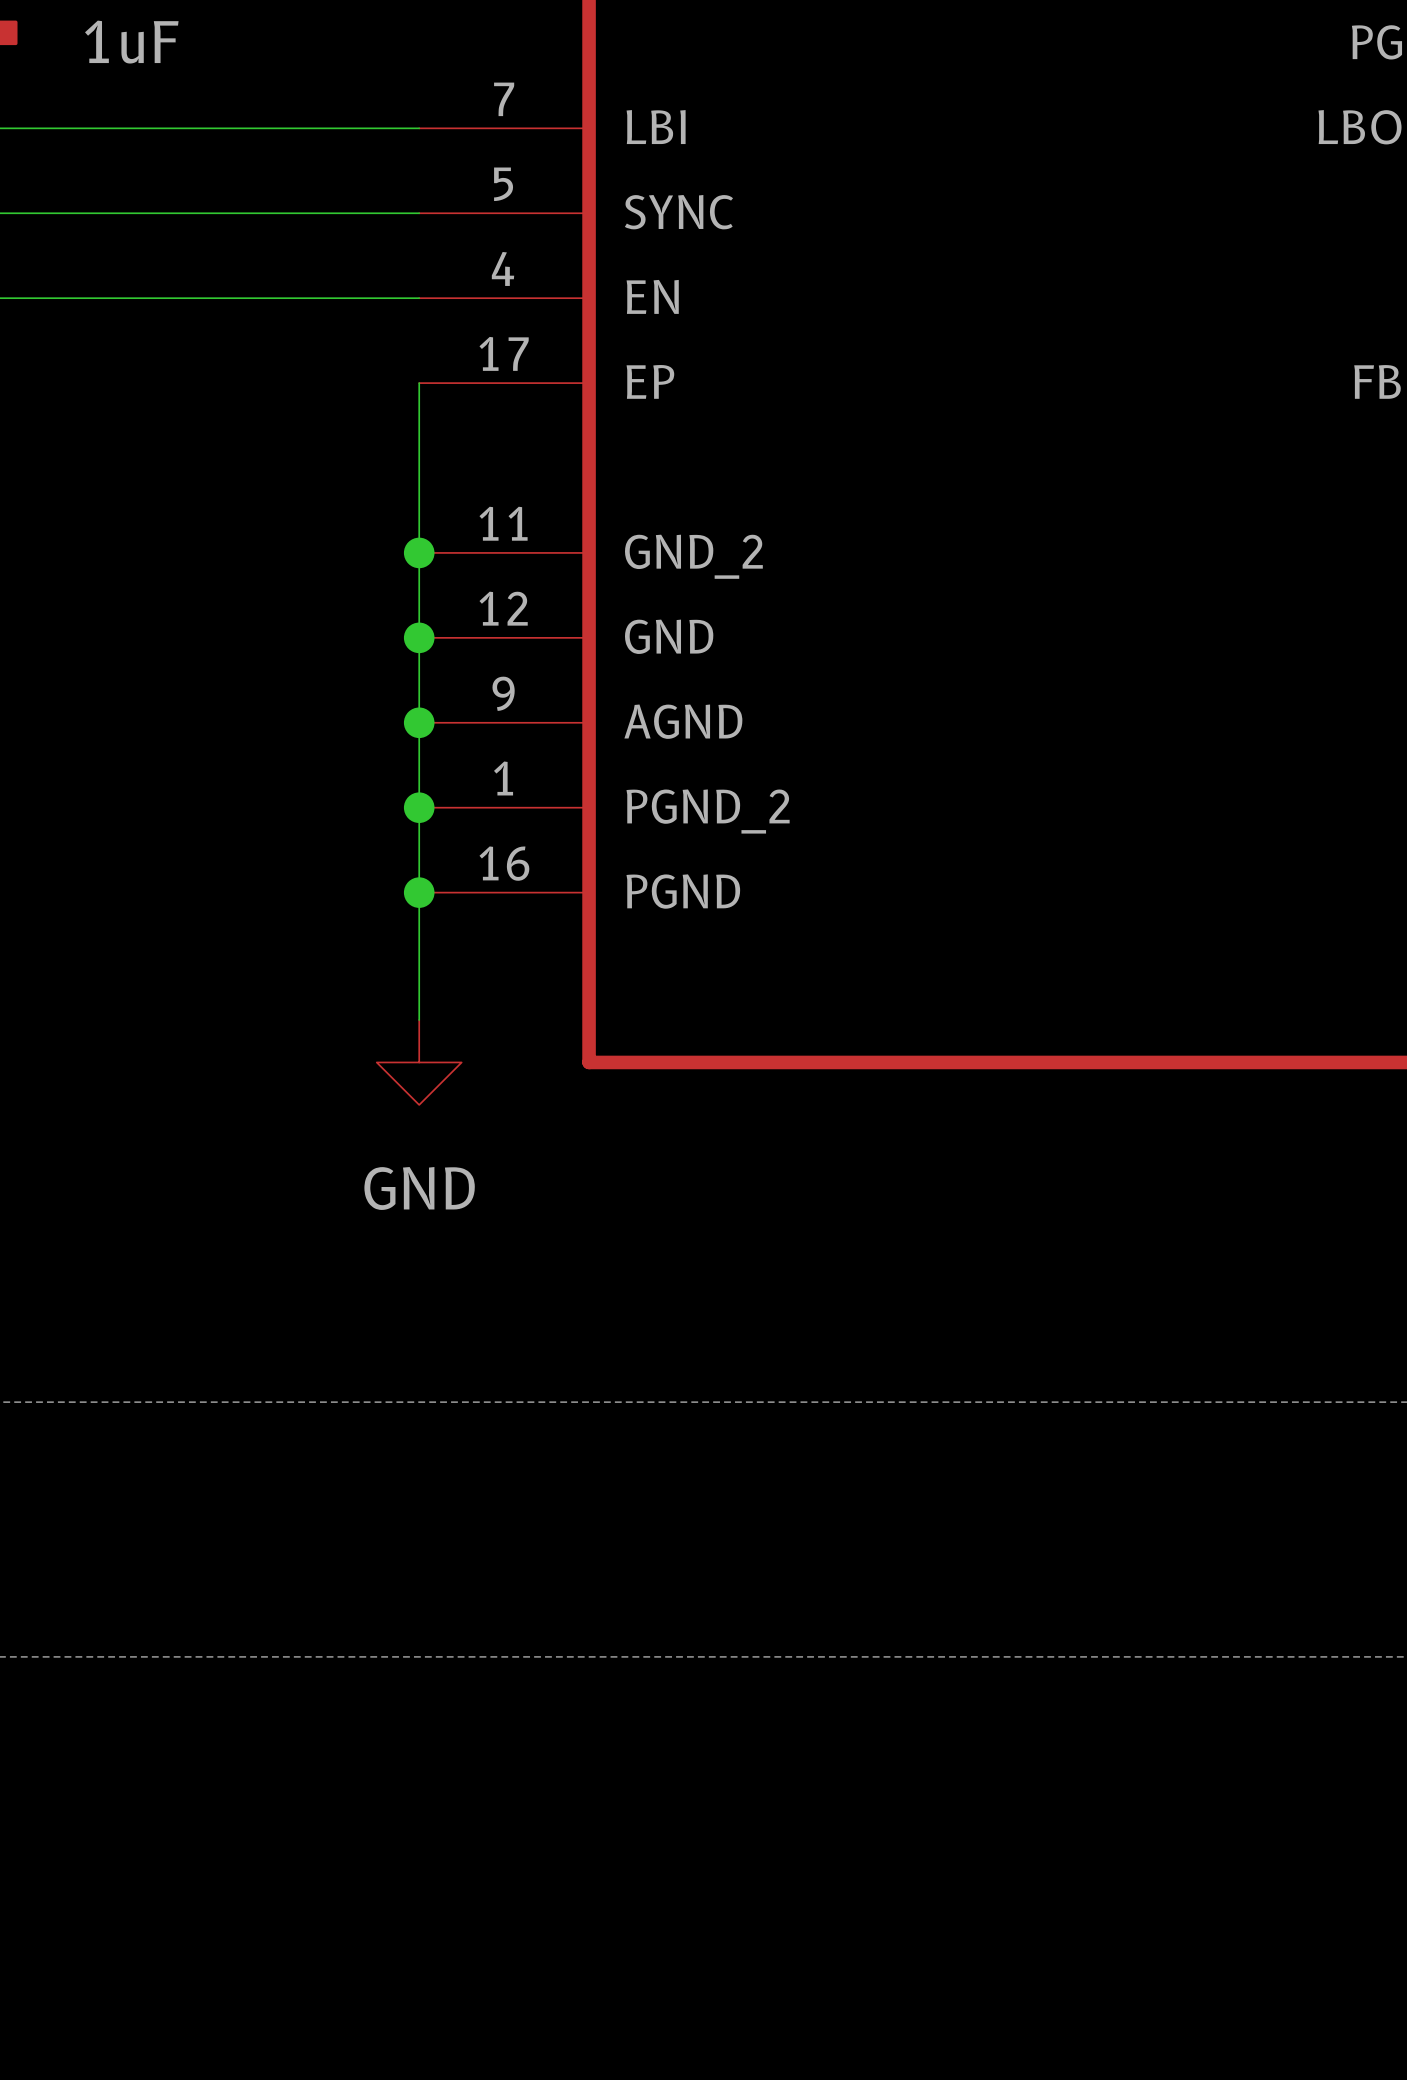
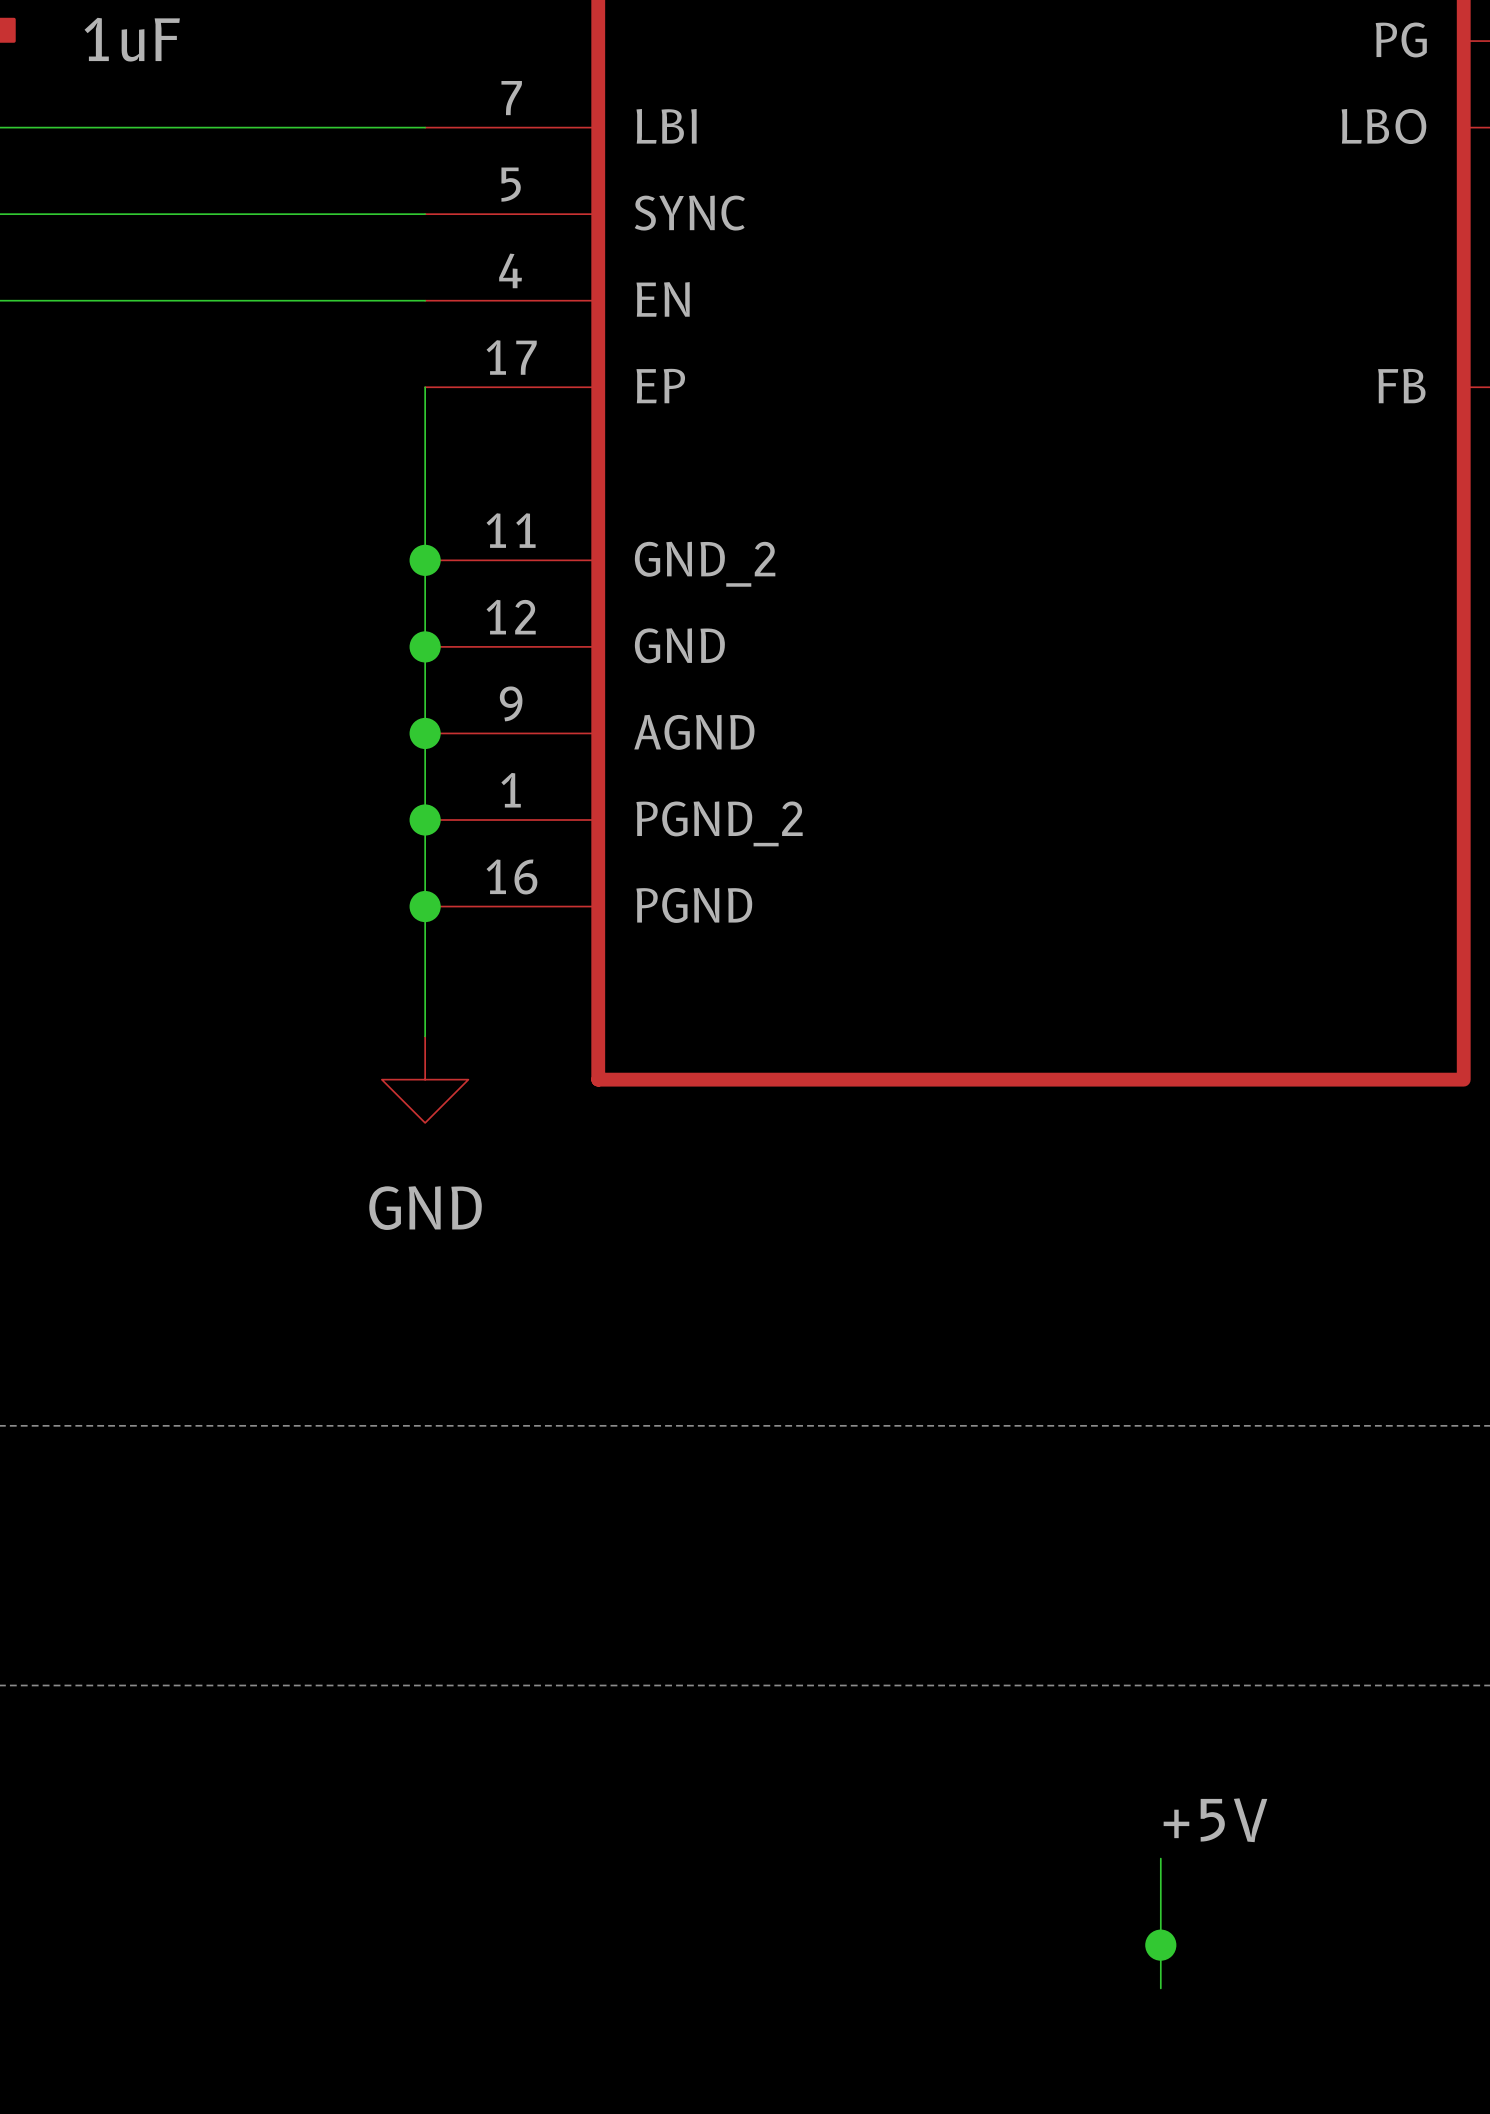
label: none -> +5V (1215, 1820)
wire: none -> (1160, 1858) (1160, 1988)
junction: none -> (1160, 1945)

